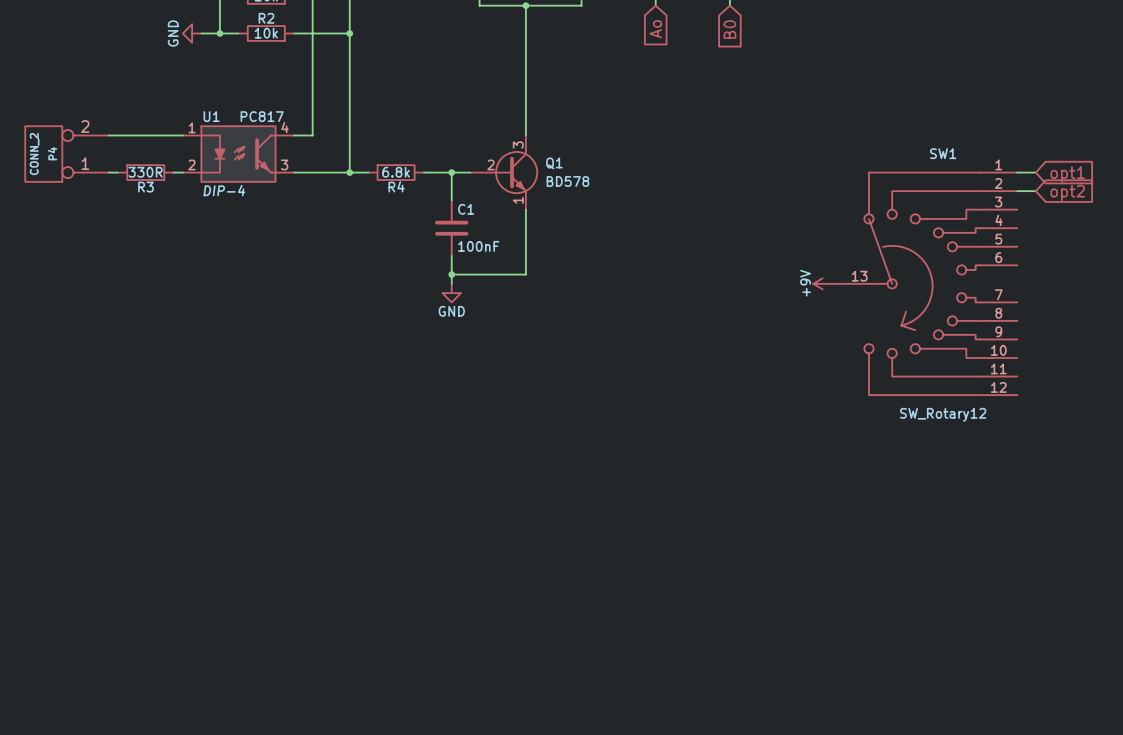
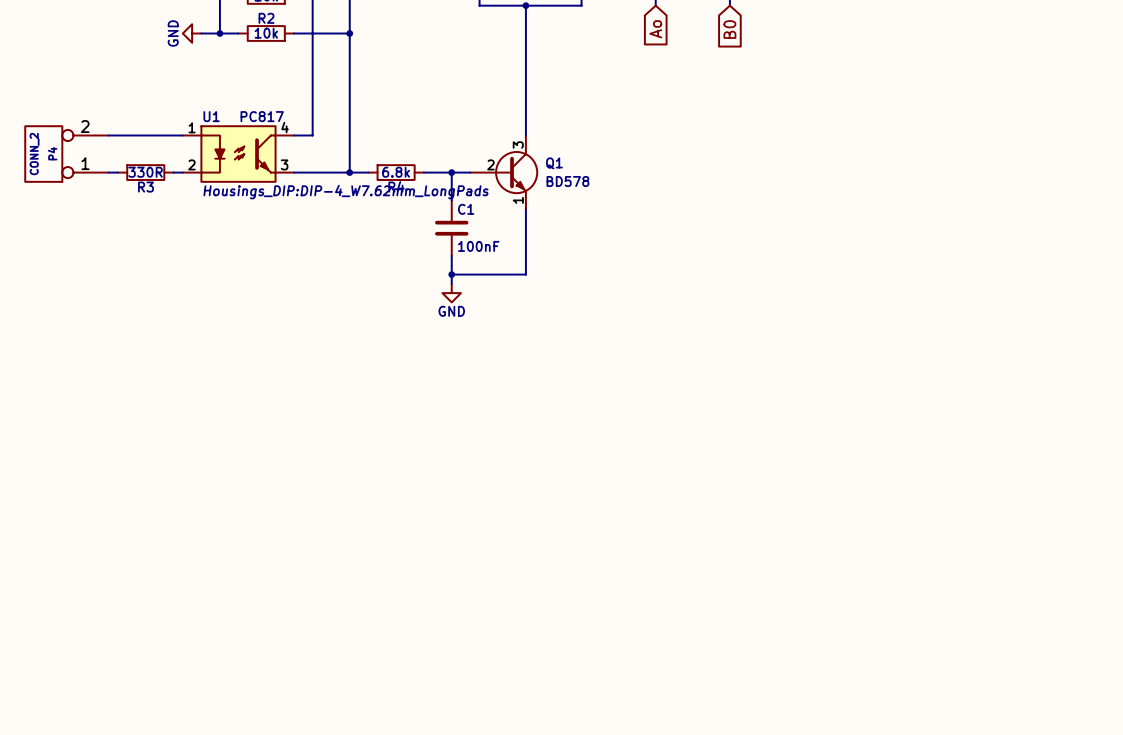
wire: (1017, 172) (1035, 172) -> none
global label: opt1 (1067, 174) -> none
U1 text: DIP-4 (224, 190) -> Housings_DIP:DIP-4_W7.62mm_LongPads (345, 192)
wire: (1017, 191) (1035, 191) -> none
global label: opt2 (1067, 192) -> none
power symbol: +9V (822, 283) -> none
SW1: SW_Rotary12 (924, 283) -> none

